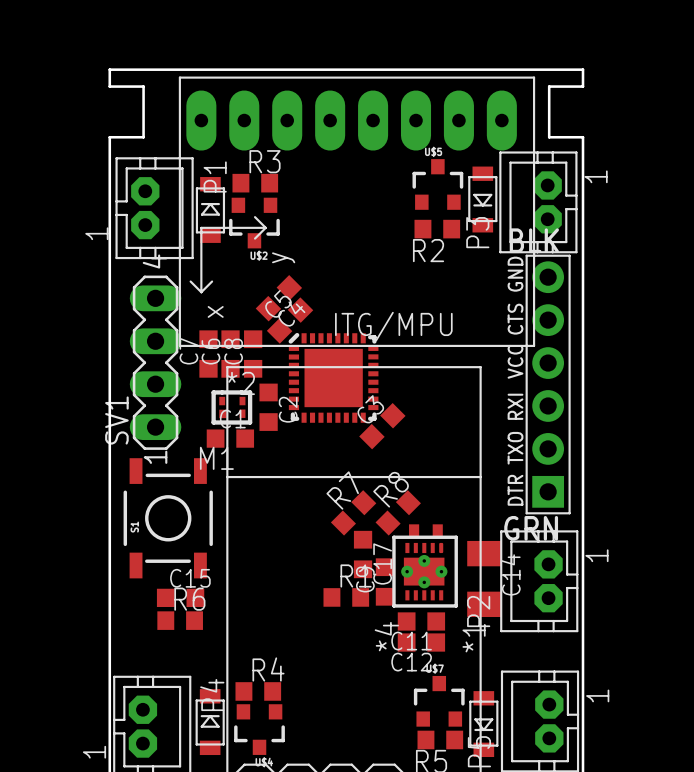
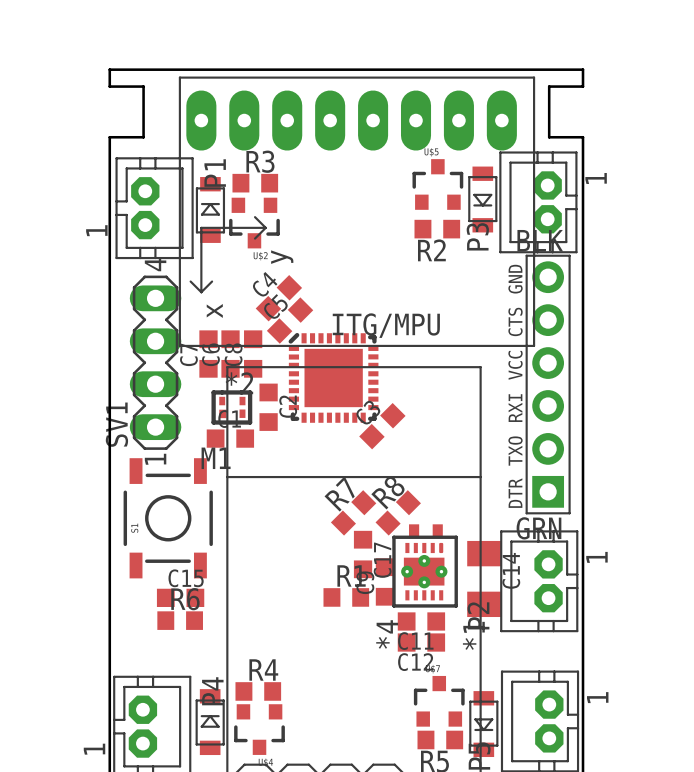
C4 name position: C4 (291, 314) -> C4 (265, 284)

